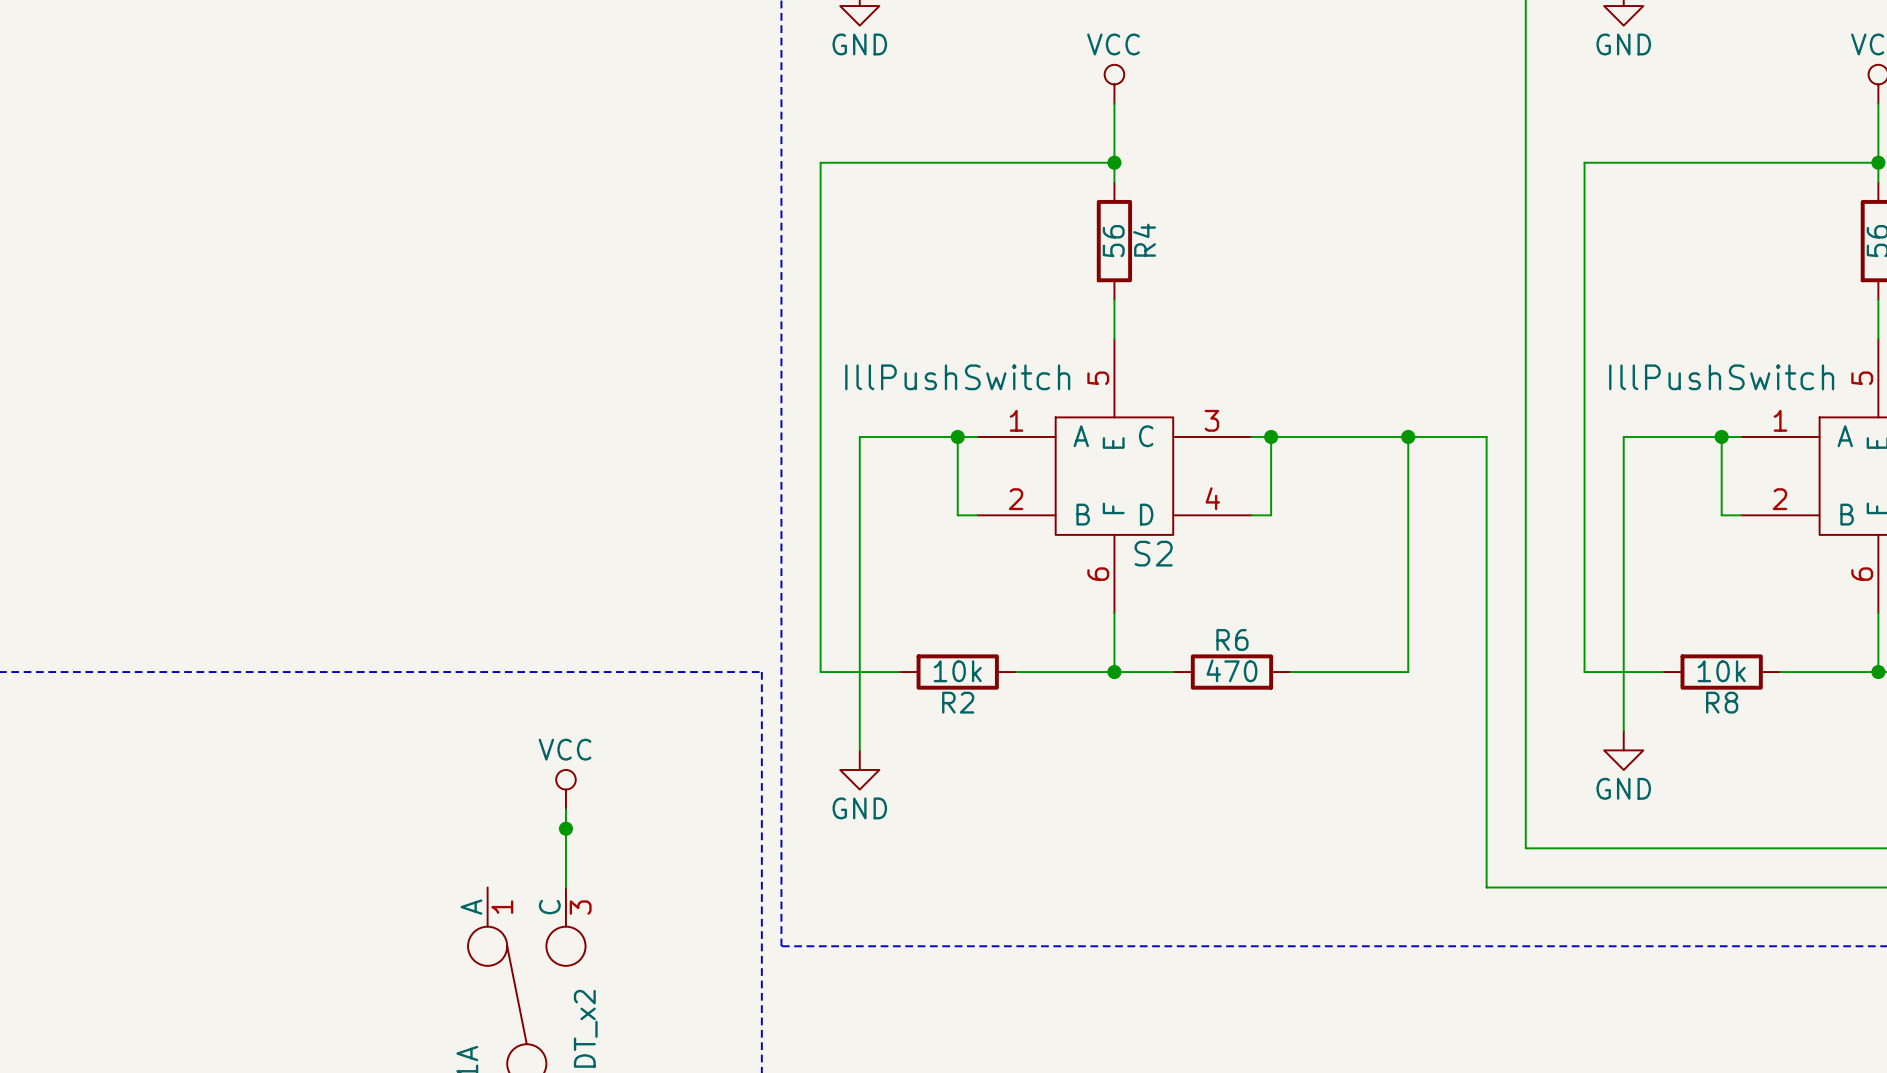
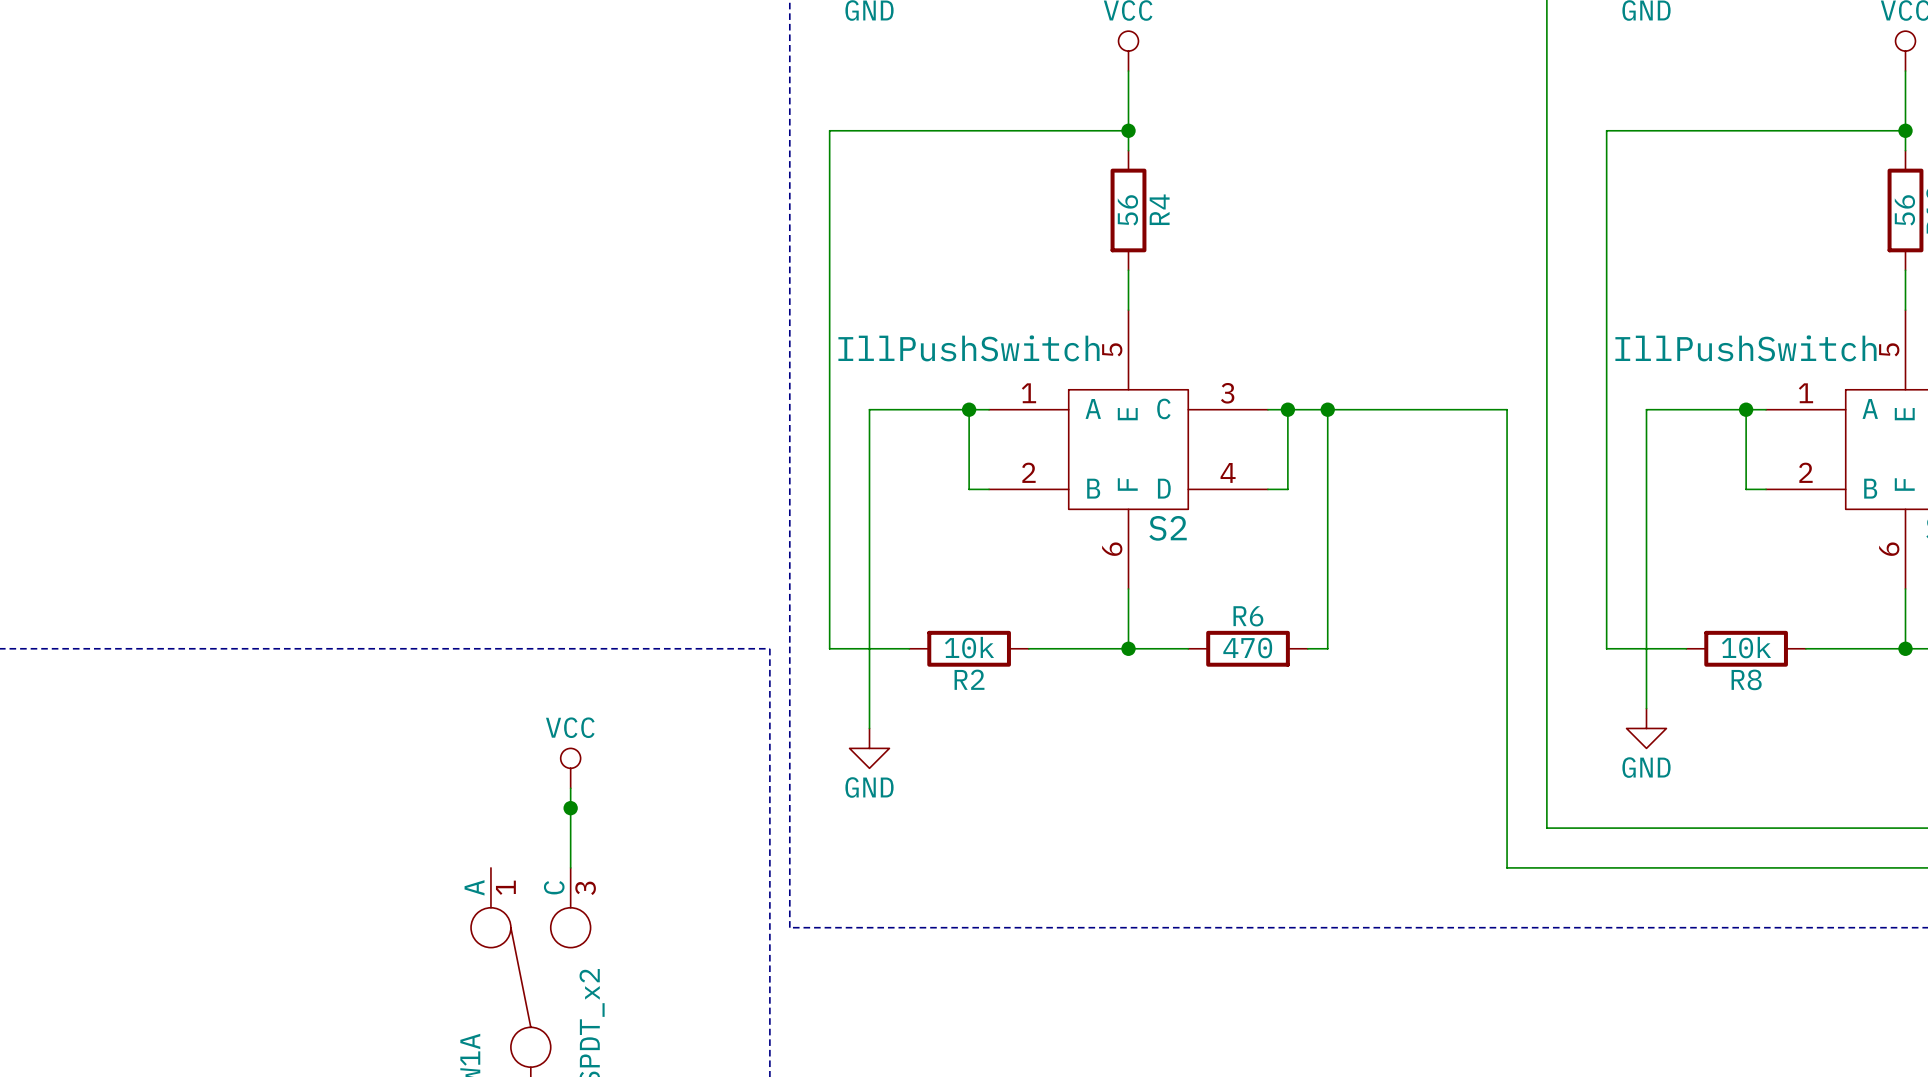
junction: none -> (1327, 409)
wire: (1408, 436) (1408, 672) (1310, 672) -> (1327, 409) (1327, 648)
junction: (1408, 436) -> none

